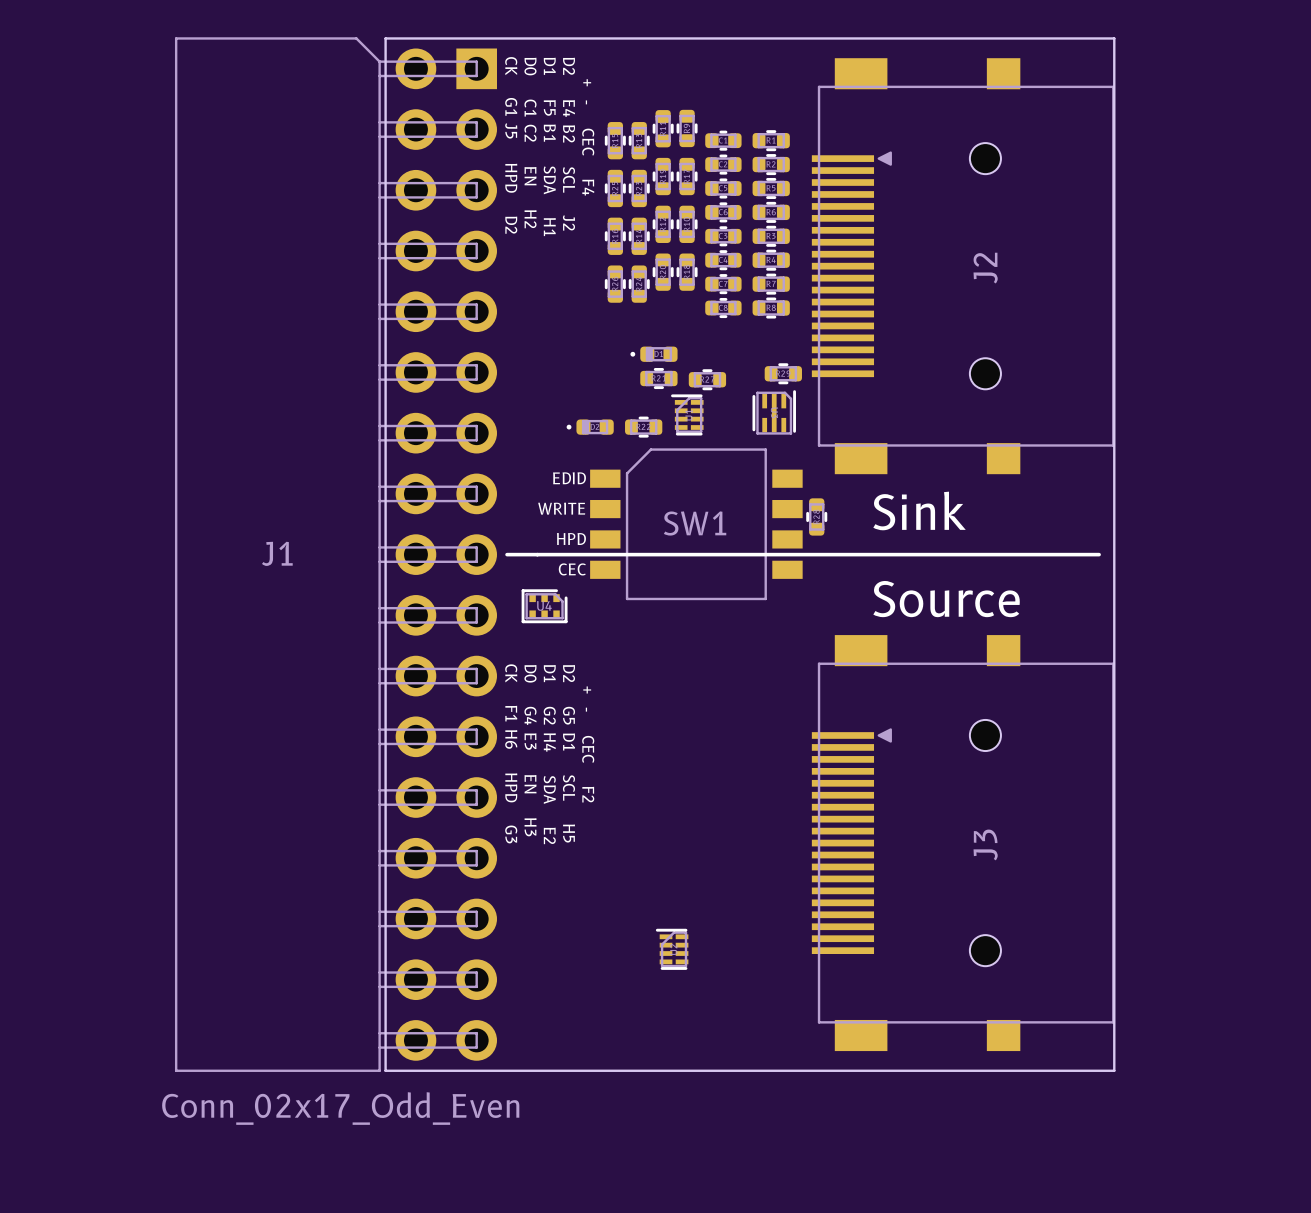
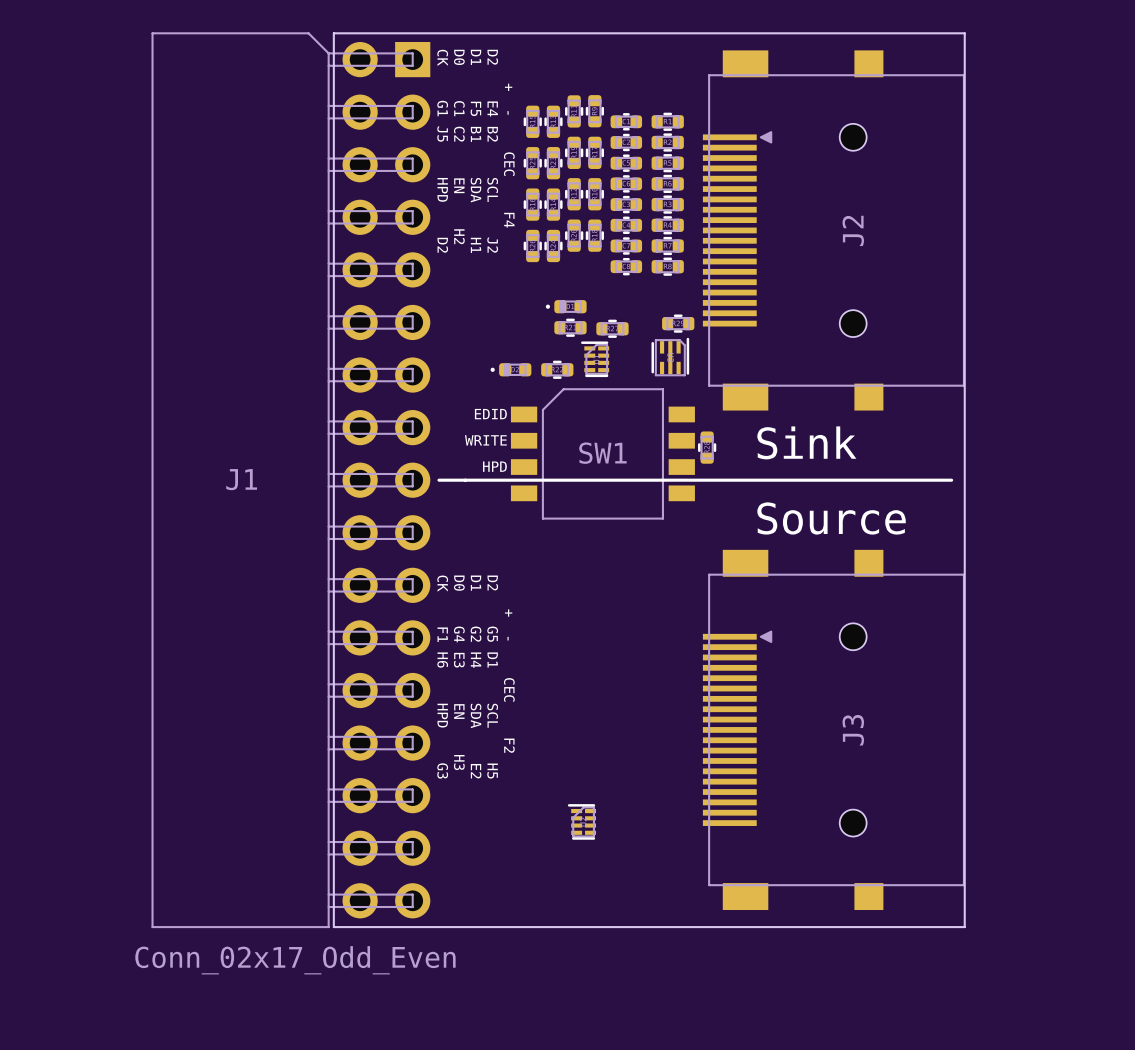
text: CEC (572, 569) -> none
U4: (544, 606) -> none

